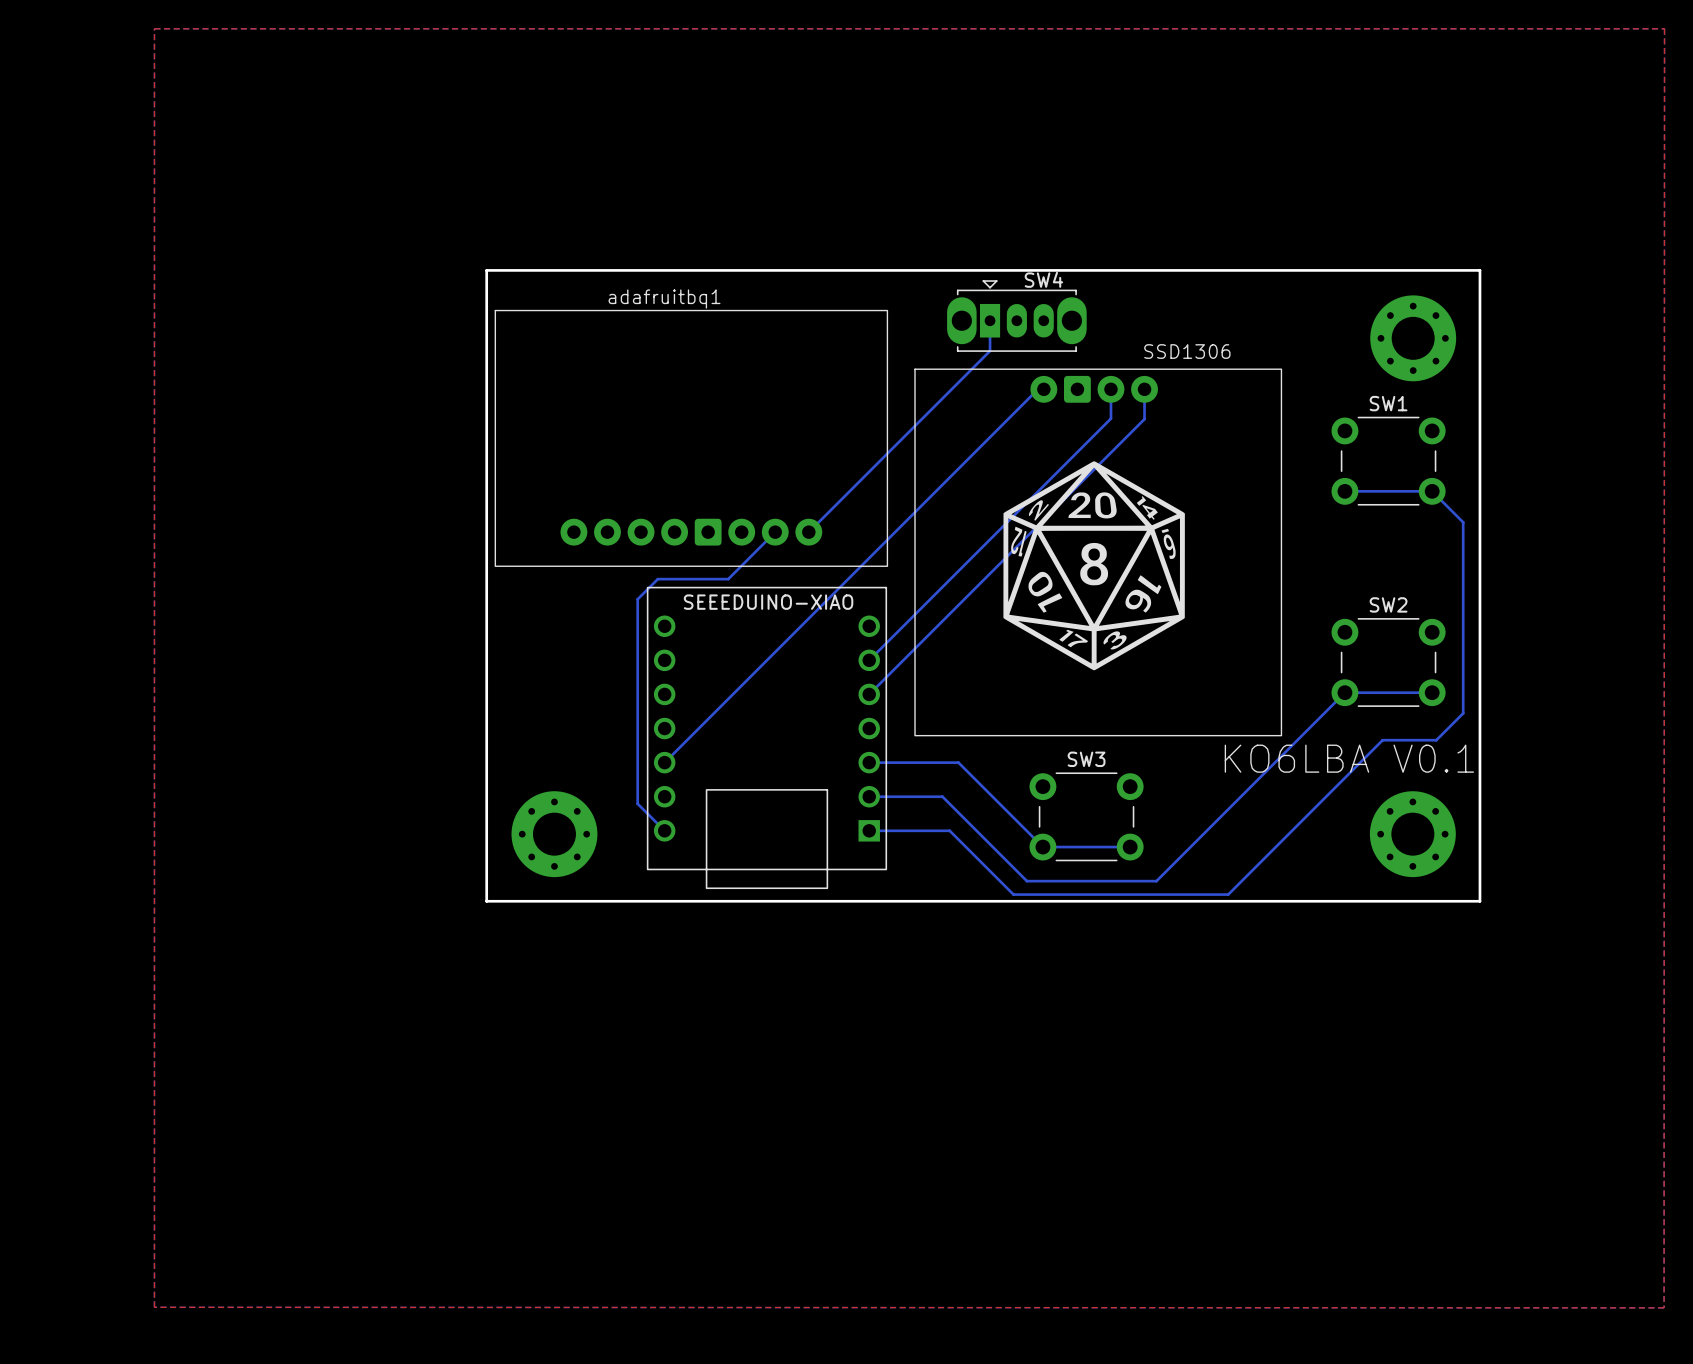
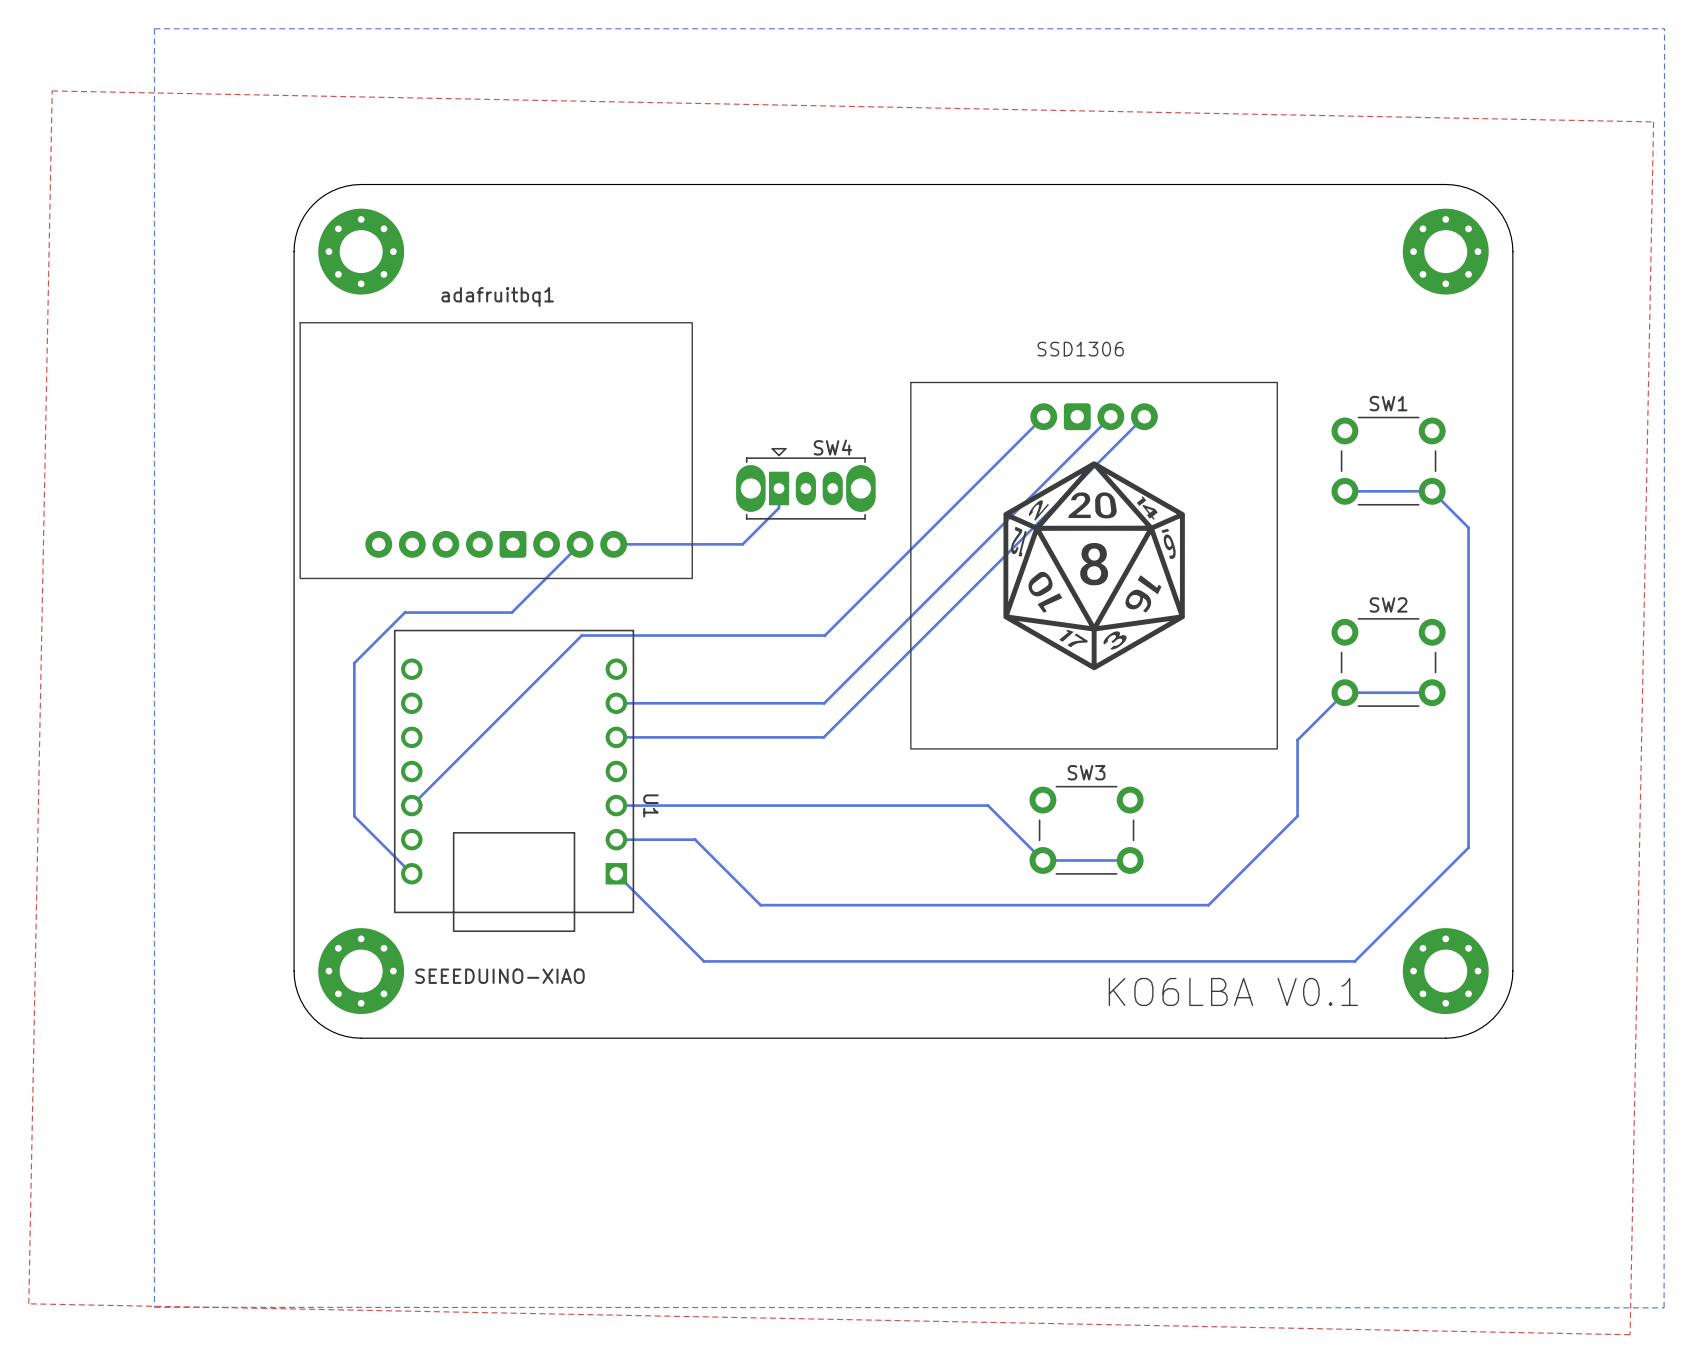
top zone outline: (154, 28) (1664, 28) (1664, 1307) (154, 1307) (154, 28) -> (52, 90) (28, 1303) (1630, 1334) (1653, 121) (52, 90)
part: none -> (361, 251)
board edge: (486, 270) (1479, 270) (1479, 901) (486, 901) (486, 270) -> (361, 184) (346, 186) (332, 191) (313, 204) (300, 222) (295, 236) (294, 251) (294, 971) (295, 986) (300, 1000) (308, 1012) (319, 1023) (339, 1034) (361, 1038) (1445, 1038) (1460, 1036) (1474, 1031) (1487, 1023) (1498, 1012) (1509, 993) (1512, 971) (1512, 251) (1511, 236) (1506, 222) (1498, 209) (1487, 199) (1467, 188) (1445, 184) (361, 184)
adafruitbq1 name position: adafruitbq1 (664, 298) -> adafruitbq1 (497, 296)
SW4 position: (1016, 316) -> (805, 483)
bottom track: (990, 320) (990, 350) (808, 532) -> none
part position: (1413, 338) -> (1445, 251)
SSD1306 name position: SSD1306 (1187, 351) -> SSD1306 (1080, 349)
SSD1306 footprint: [914, 368, 1283, 737] -> [910, 381, 1278, 750]
bottom track: (1043, 389) (1037, 389) (664, 762) -> none
bottom track: (1110, 389) (1110, 418) (869, 660) -> none
bottom track: (1144, 389) (1144, 419) (869, 694) -> none
bottom track: none -> (1043, 416) (824, 635) (581, 635) (411, 805)
bottom track: none -> (1110, 416) (824, 703) (616, 703)
bottom track: none -> (1144, 416) (823, 737) (616, 737)
adafruitbq1 position: (691, 438) -> (496, 450)
bottom track: none -> (779, 488) (779, 507) (742, 544) (613, 544)
bottom track: (1463, 522) (1463, 713) (1436, 740) (1382, 740) (1228, 894) (1013, 894) (949, 830) (869, 830) -> (1463, 522) (1468, 527) (1468, 847) (1354, 961) (704, 961) (616, 873)
bottom track: (775, 532) (728, 579) (657, 579) (637, 599) (637, 803) (664, 830) -> none
bottom track: none -> (580, 544) (511, 612) (404, 612) (354, 663) (354, 816) (411, 873)
text: SEEEDUINO-XIAO (768, 602) -> none
part: (766, 737) -> none
bottom track: (1297, 740) (1156, 881) (1026, 881) (942, 796) (869, 796) -> (1297, 740) (1297, 816) (1208, 905) (760, 905) (695, 839) (616, 839)
text position: KO6LBA V0.1 (1349, 758) -> KO6LBA V0.1 (1233, 991)
bottom track: (869, 762) (958, 762) (1042, 847) (1130, 847) -> none
U1: none -> (514, 780)
bottom track: none -> (616, 805) (988, 805) (1042, 860) (1130, 860)
SW3 position: (1086, 816) -> (1086, 830)
part position: (554, 834) -> (361, 971)
part position: (1412, 834) -> (1445, 971)
text: none -> SEEEDUINO-XIAO (499, 976)

